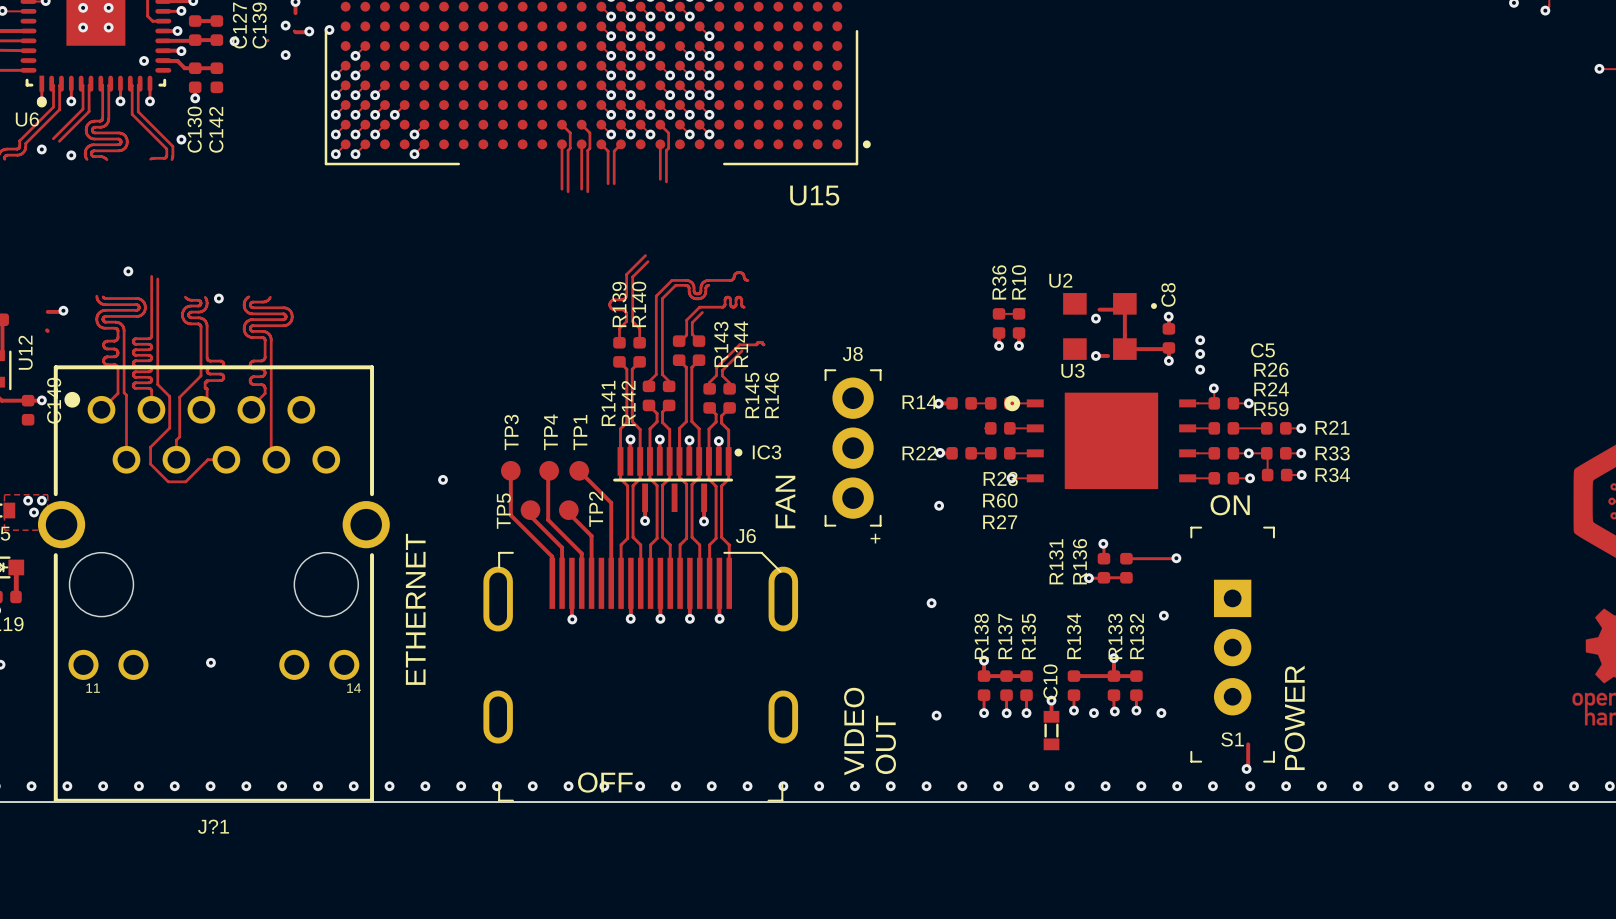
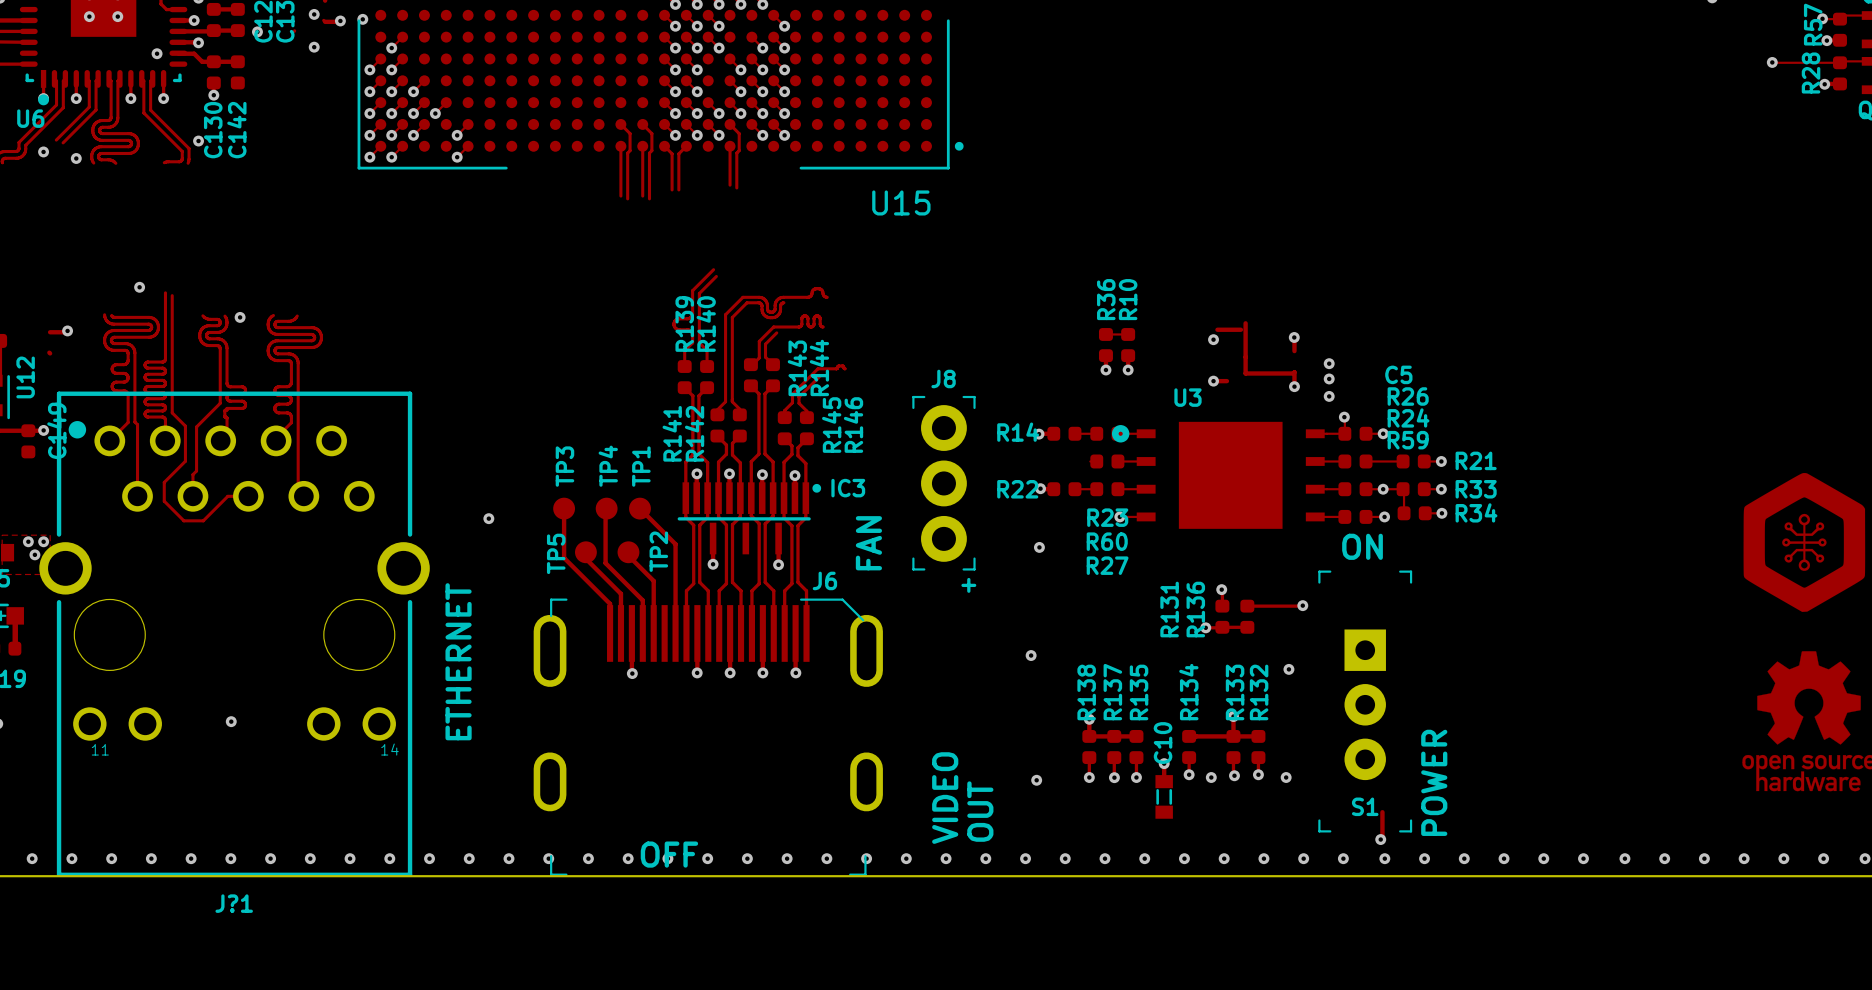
U2: (1110, 326) -> none
C8: (1168, 338) -> none

